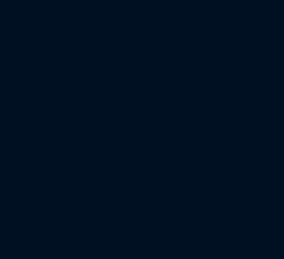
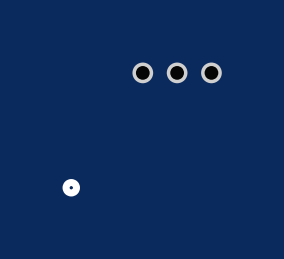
part: none -> (177, 72)
part: none -> (71, 187)

